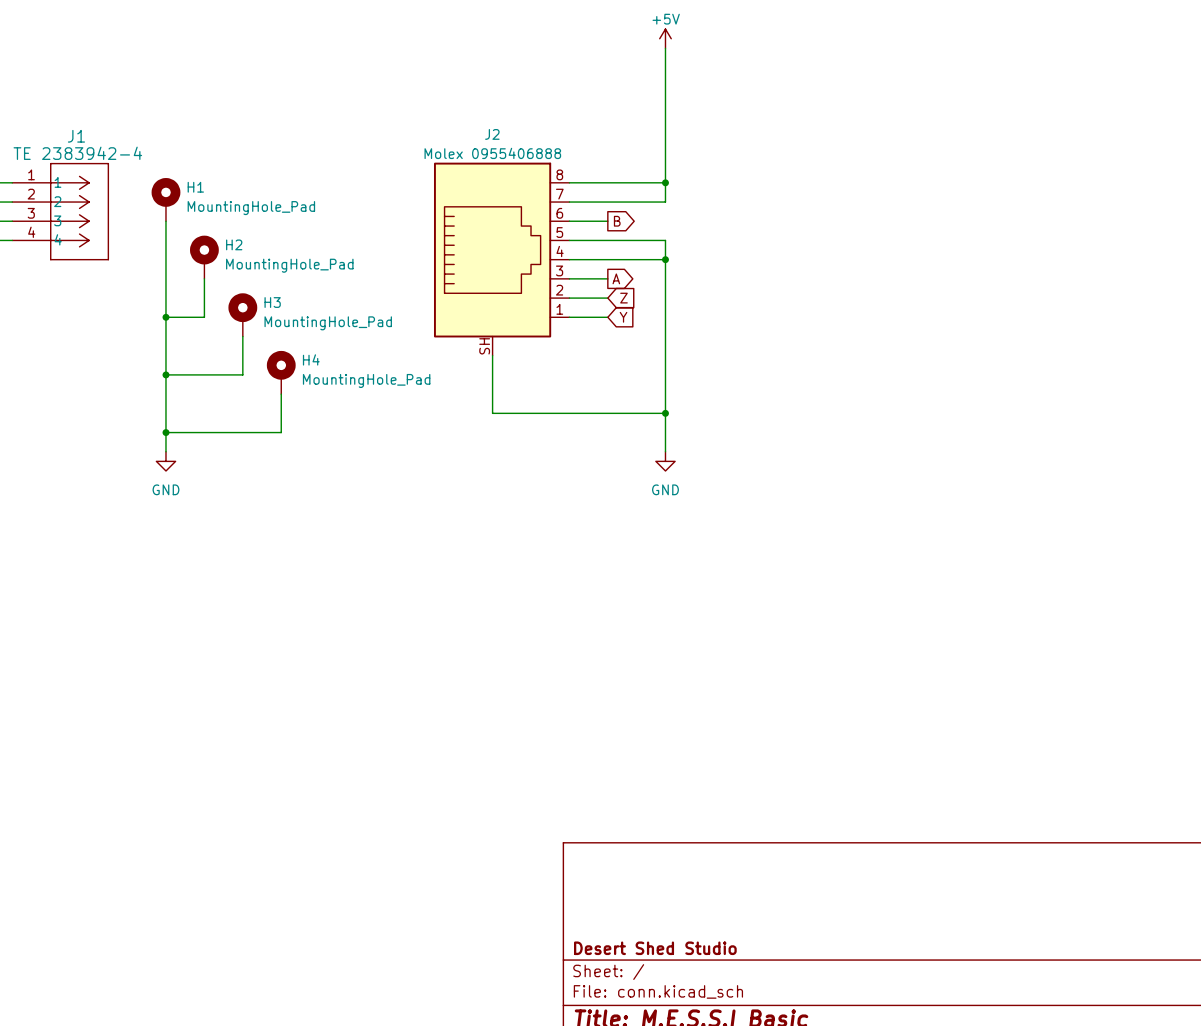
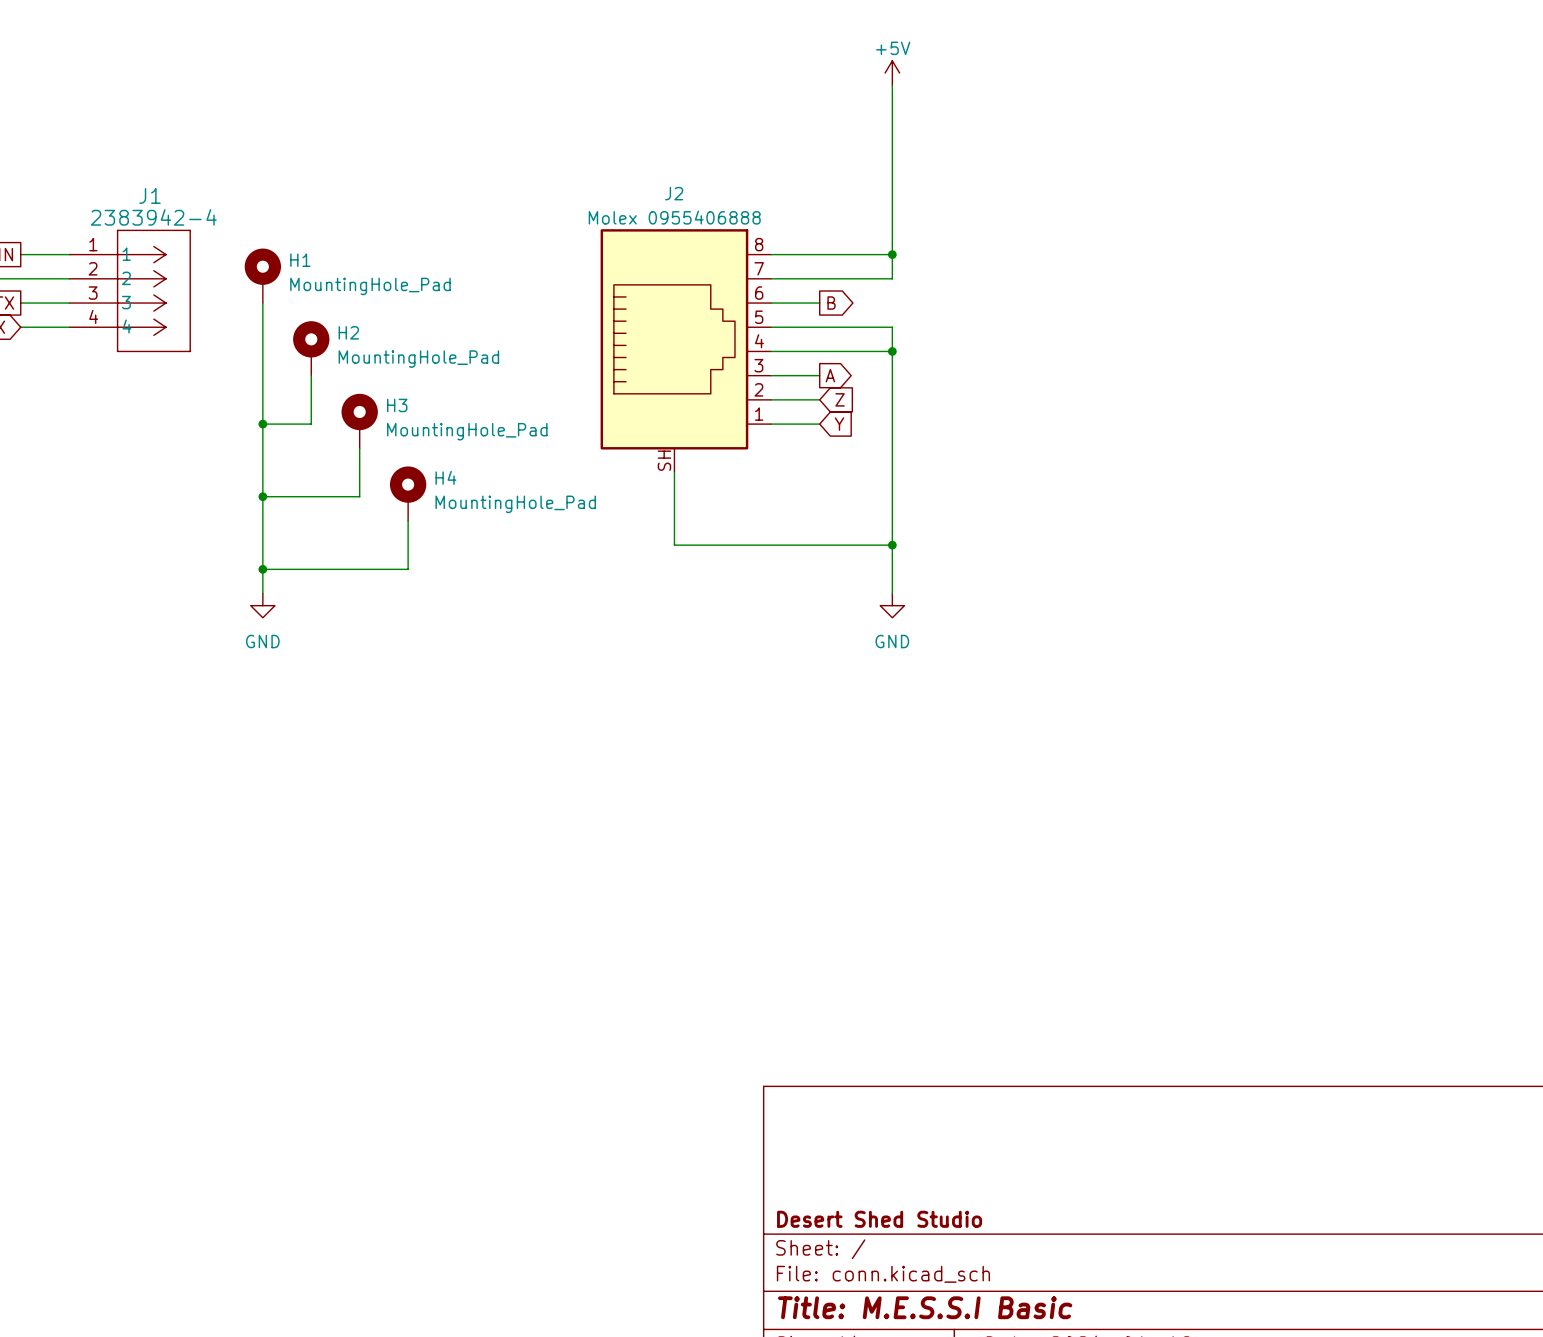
J1 value: TE 2383942-4 (77, 153) -> 2383942-4 (153, 217)

